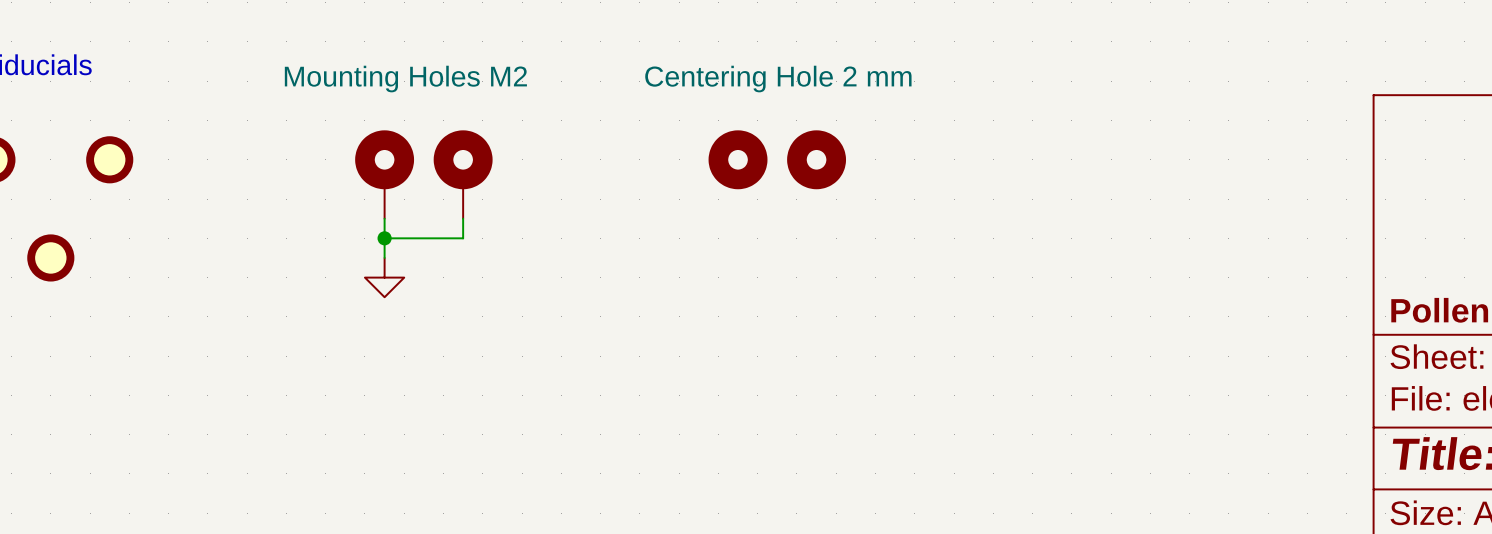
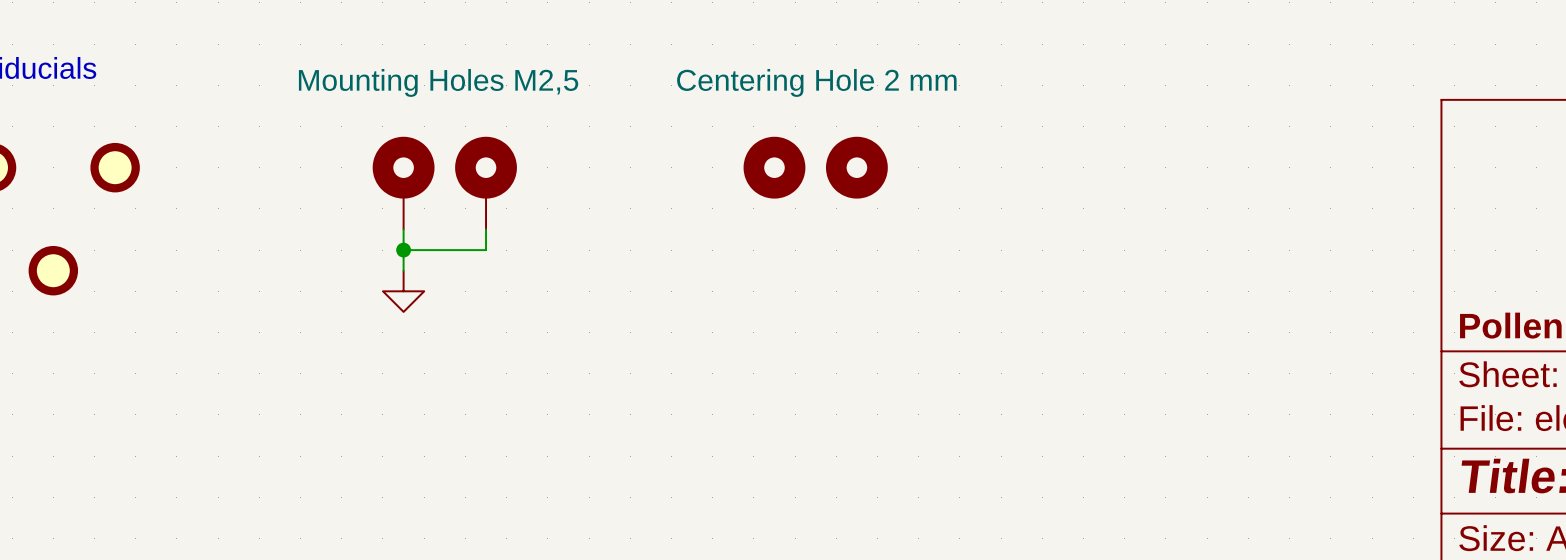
part value: Mounting Holes M2 (405, 79) -> Mounting Holes M2,5 (438, 82)

